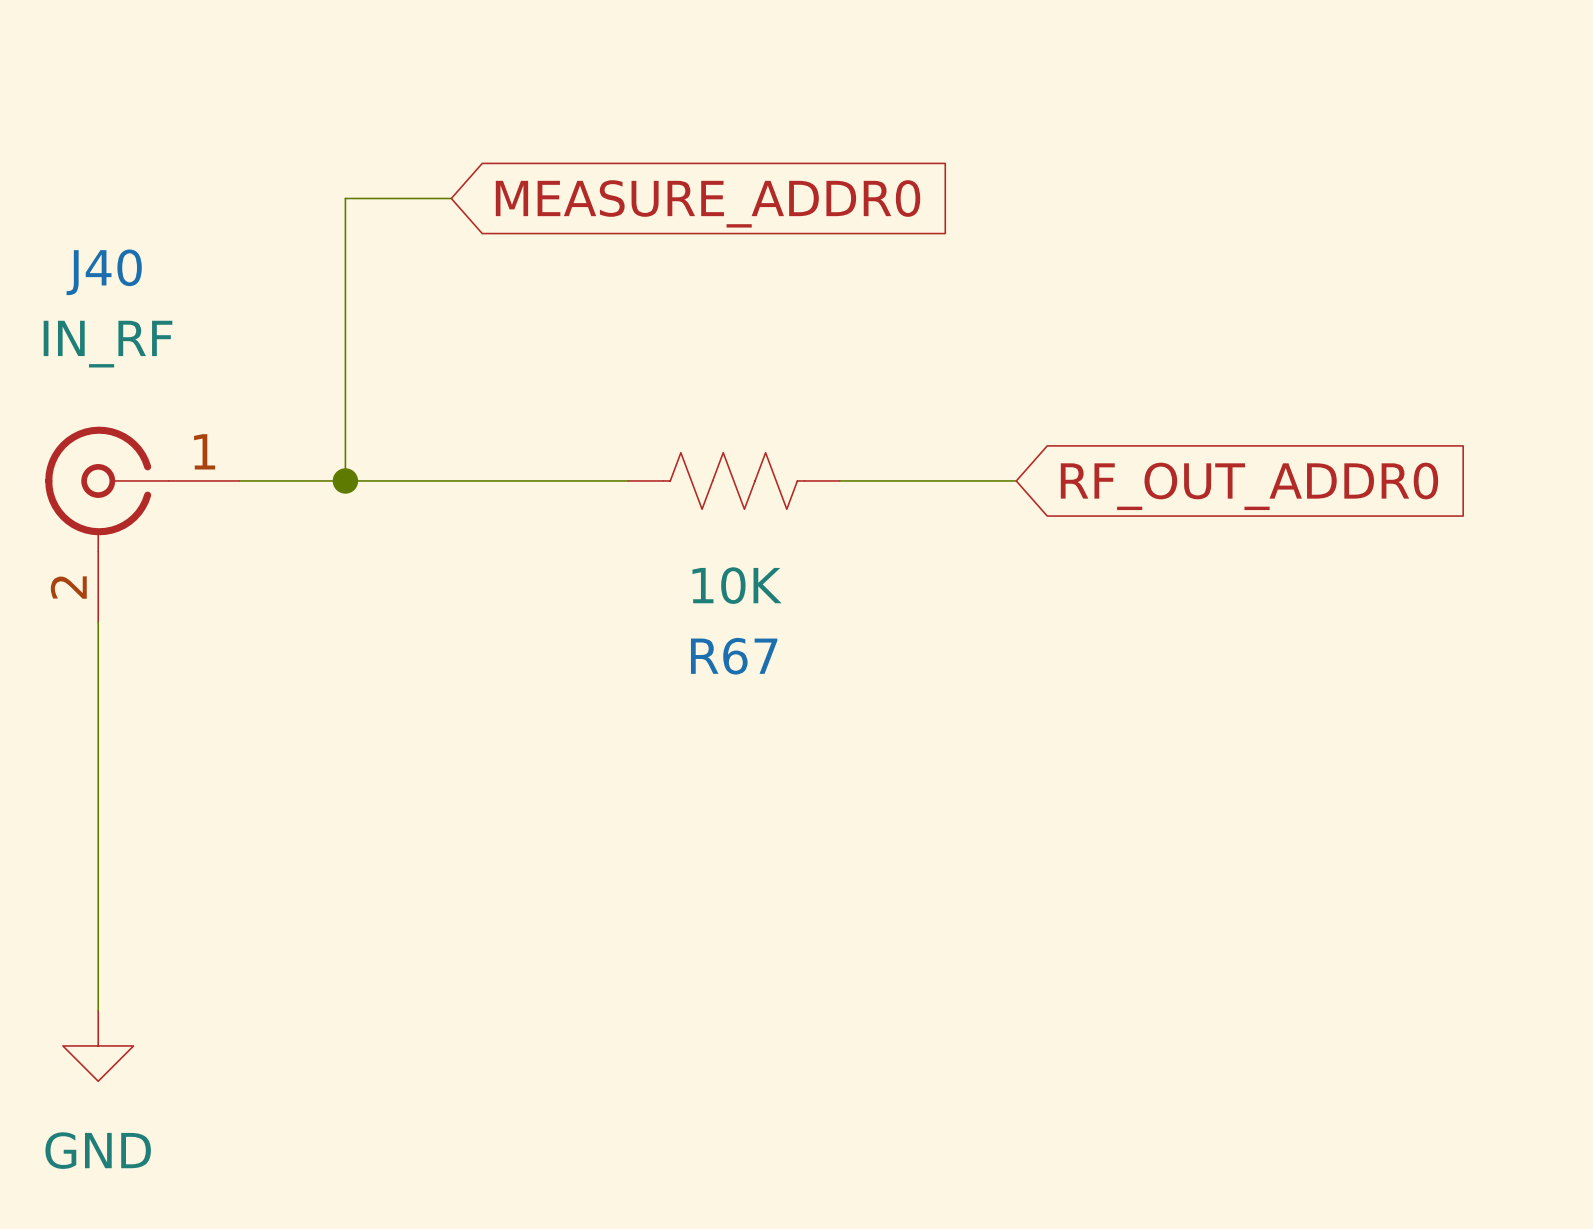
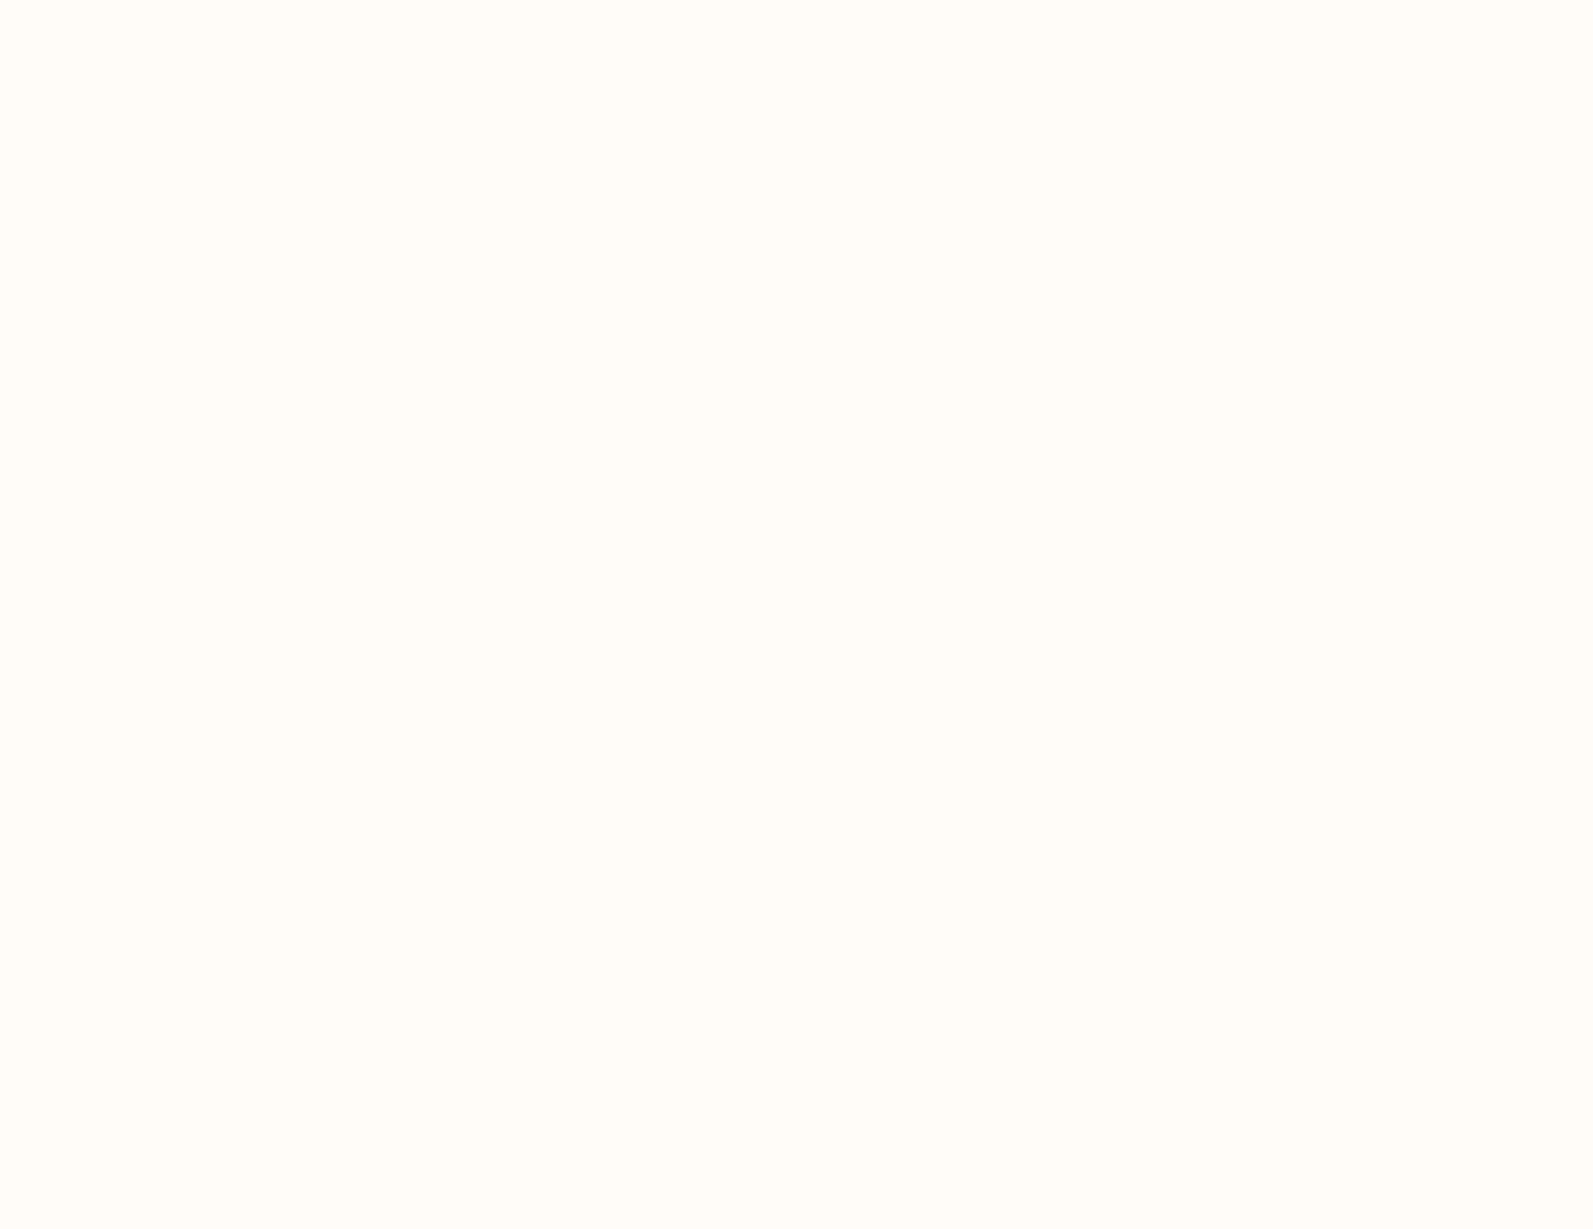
wire: (451, 198) (345, 198) (345, 480) -> none
global label: MEASURE_ADDR0 (708, 203) -> none
wire: (239, 480) (627, 480) -> none
junction: (345, 480) -> none
R67: 10K (733, 480) -> none
wire: (839, 480) (1016, 480) -> none
global label: RF_OUT_ADDR0 (1249, 486) -> none
J40: IN_RF (142, 524) -> none
wire: (98, 622) (98, 1010) -> none
power symbol: GND (98, 1045) -> none

